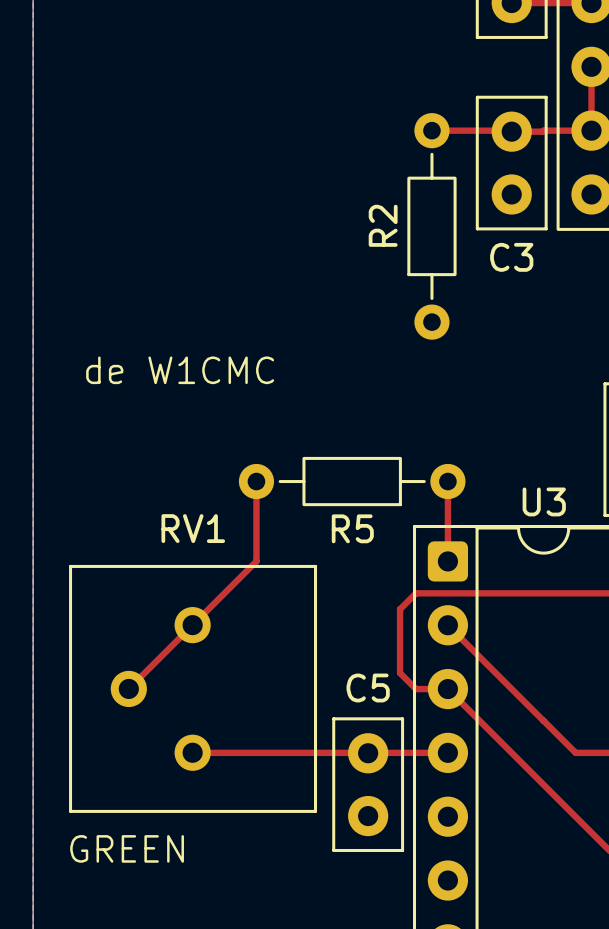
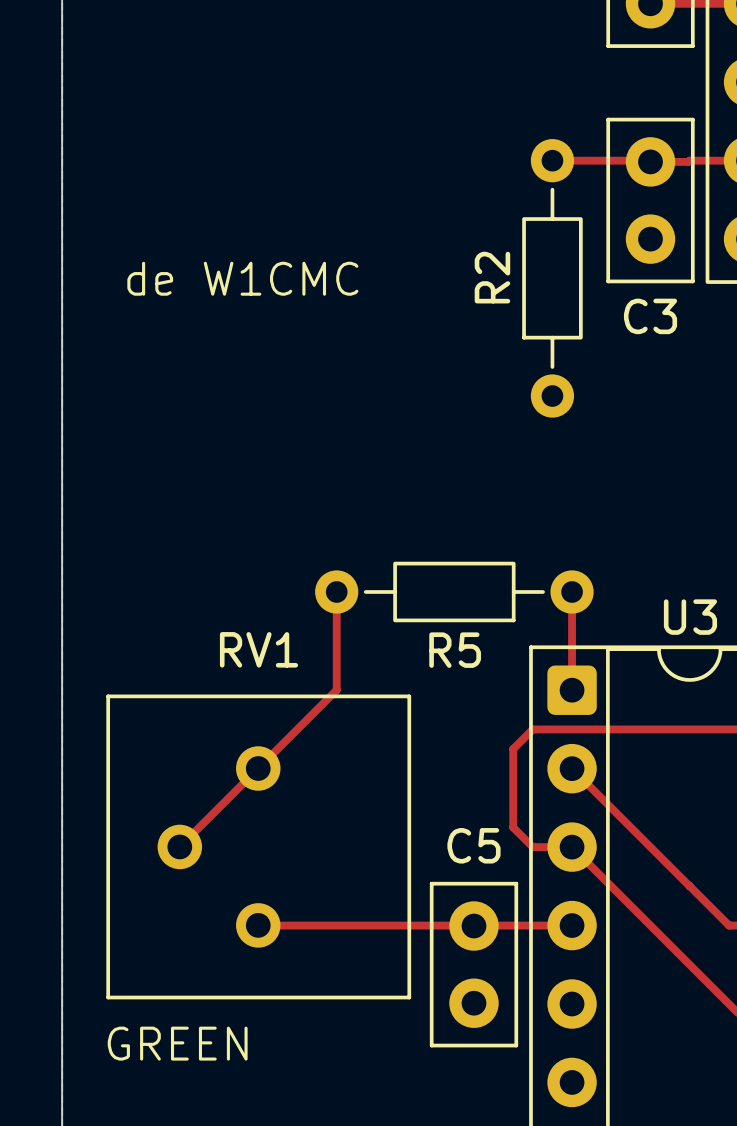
text position: de W1CMC (180, 370) -> de W1CMC (242, 278)

